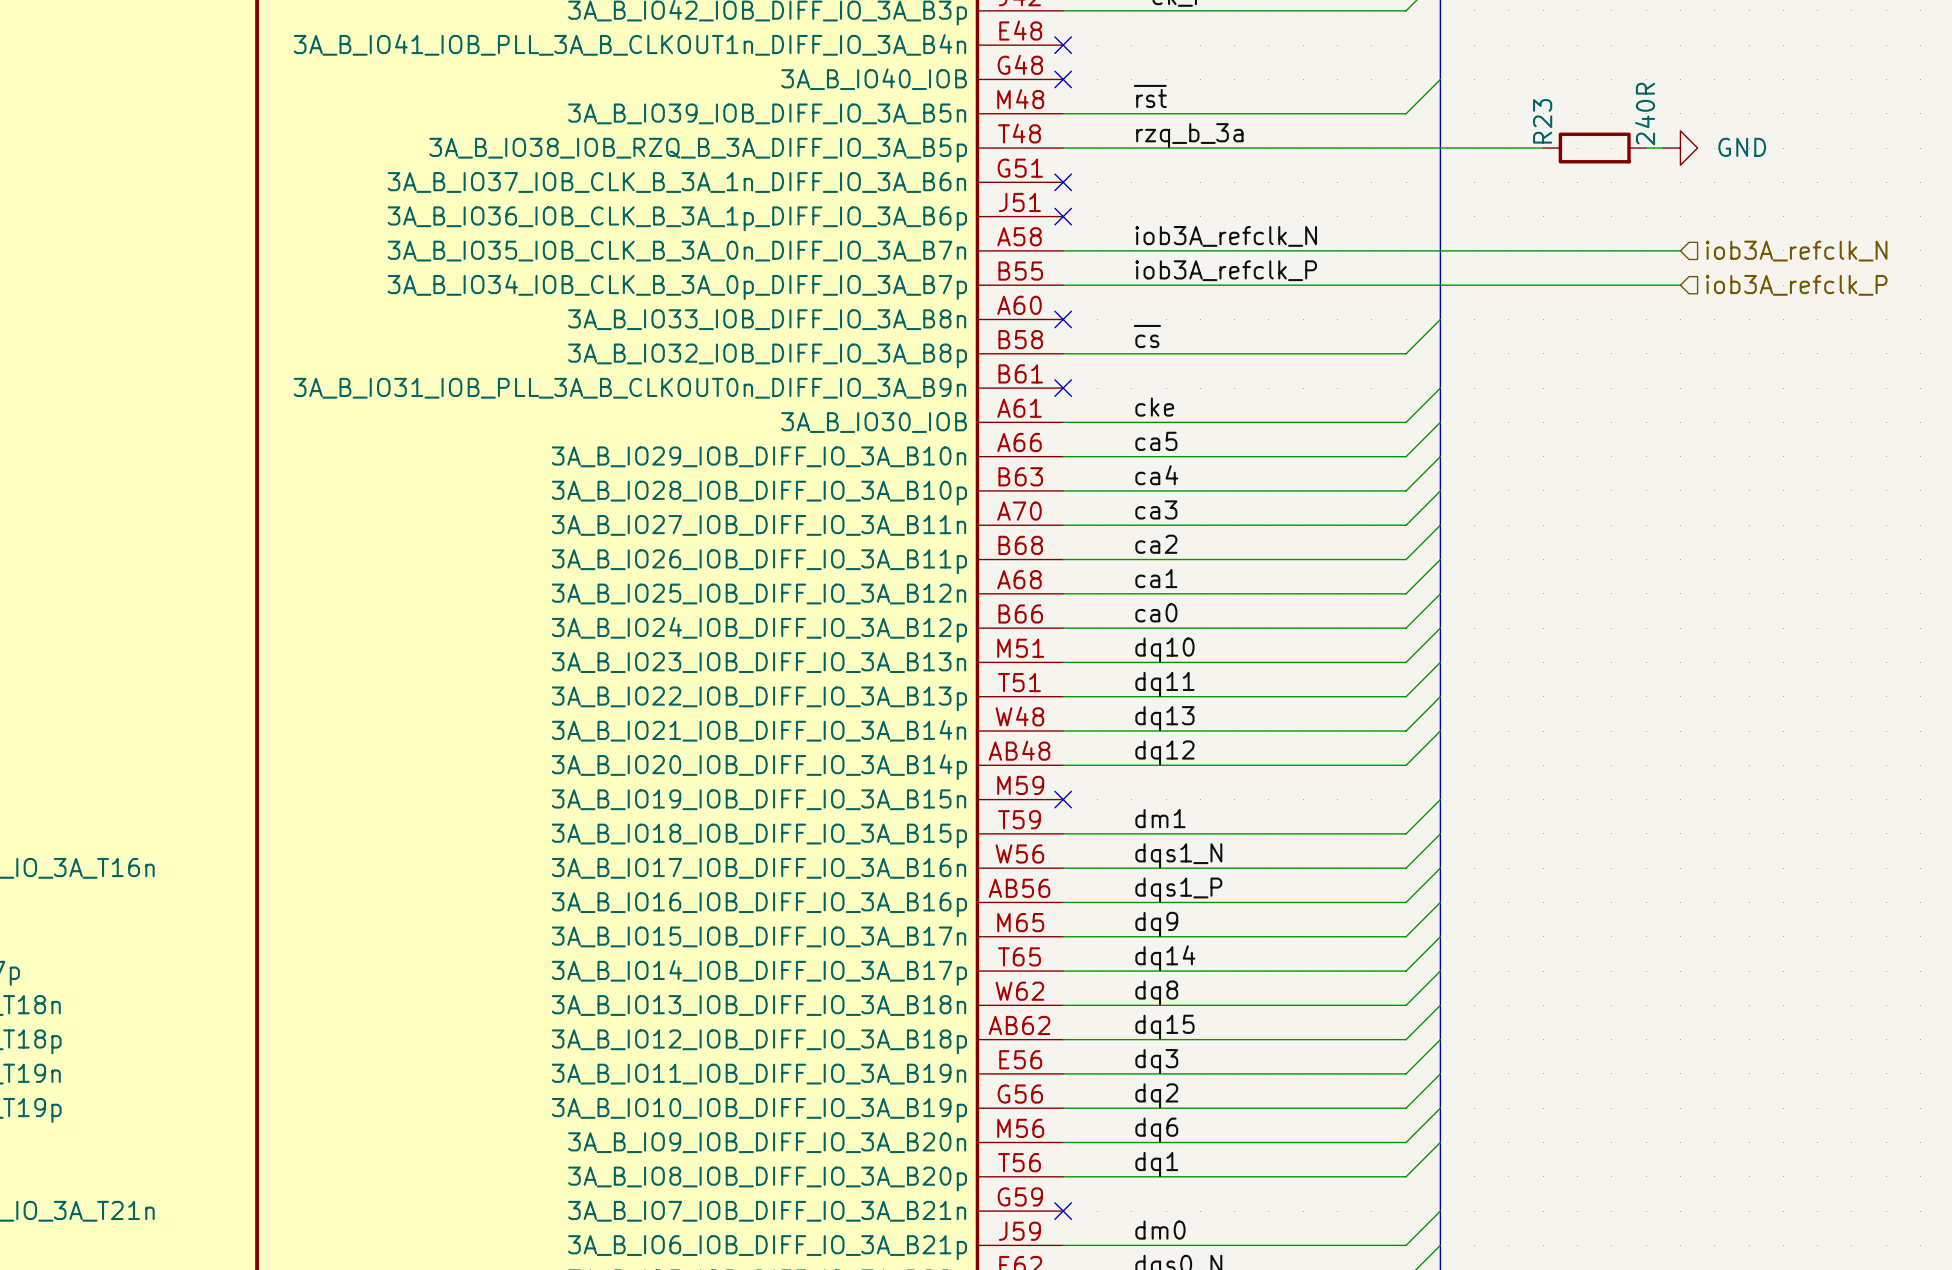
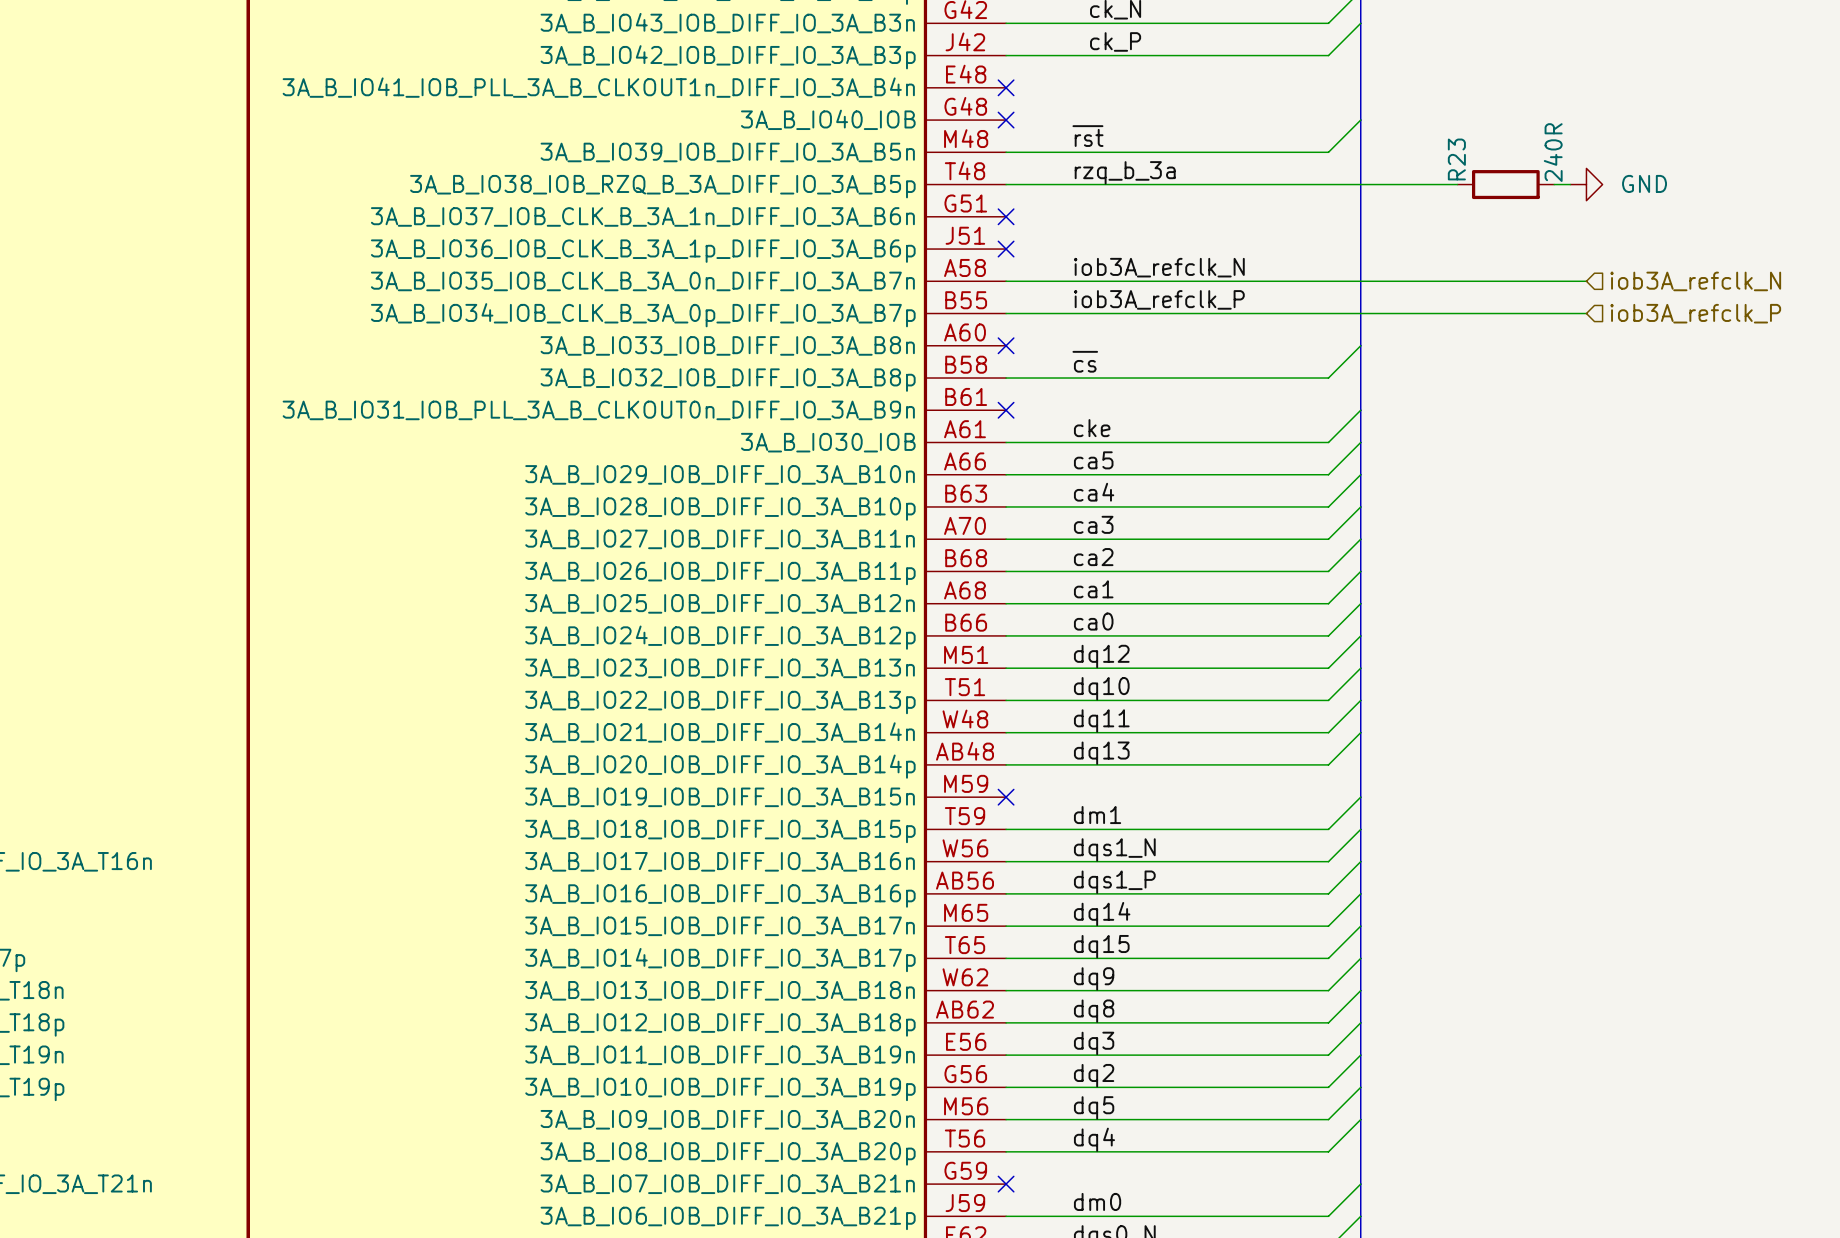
label: dq10 (1164, 649) -> dq12 (1101, 656)
label: dq11 (1164, 684) -> dq10 (1101, 688)
label: dq13 (1164, 718) -> dq11 (1101, 720)
label: dq12 (1164, 752) -> dq13 (1101, 753)
label: dq9 (1156, 924) -> dq14 (1102, 914)
label: dq14 (1165, 958) -> dq15 (1101, 946)
label: dq8 (1156, 992) -> dq9 (1094, 978)
label: dq15 (1164, 1027) -> dq8 (1094, 1011)
label: dq6 (1156, 1130) -> dq5 (1094, 1107)
label: dq1 (1156, 1164) -> dq4 (1094, 1139)

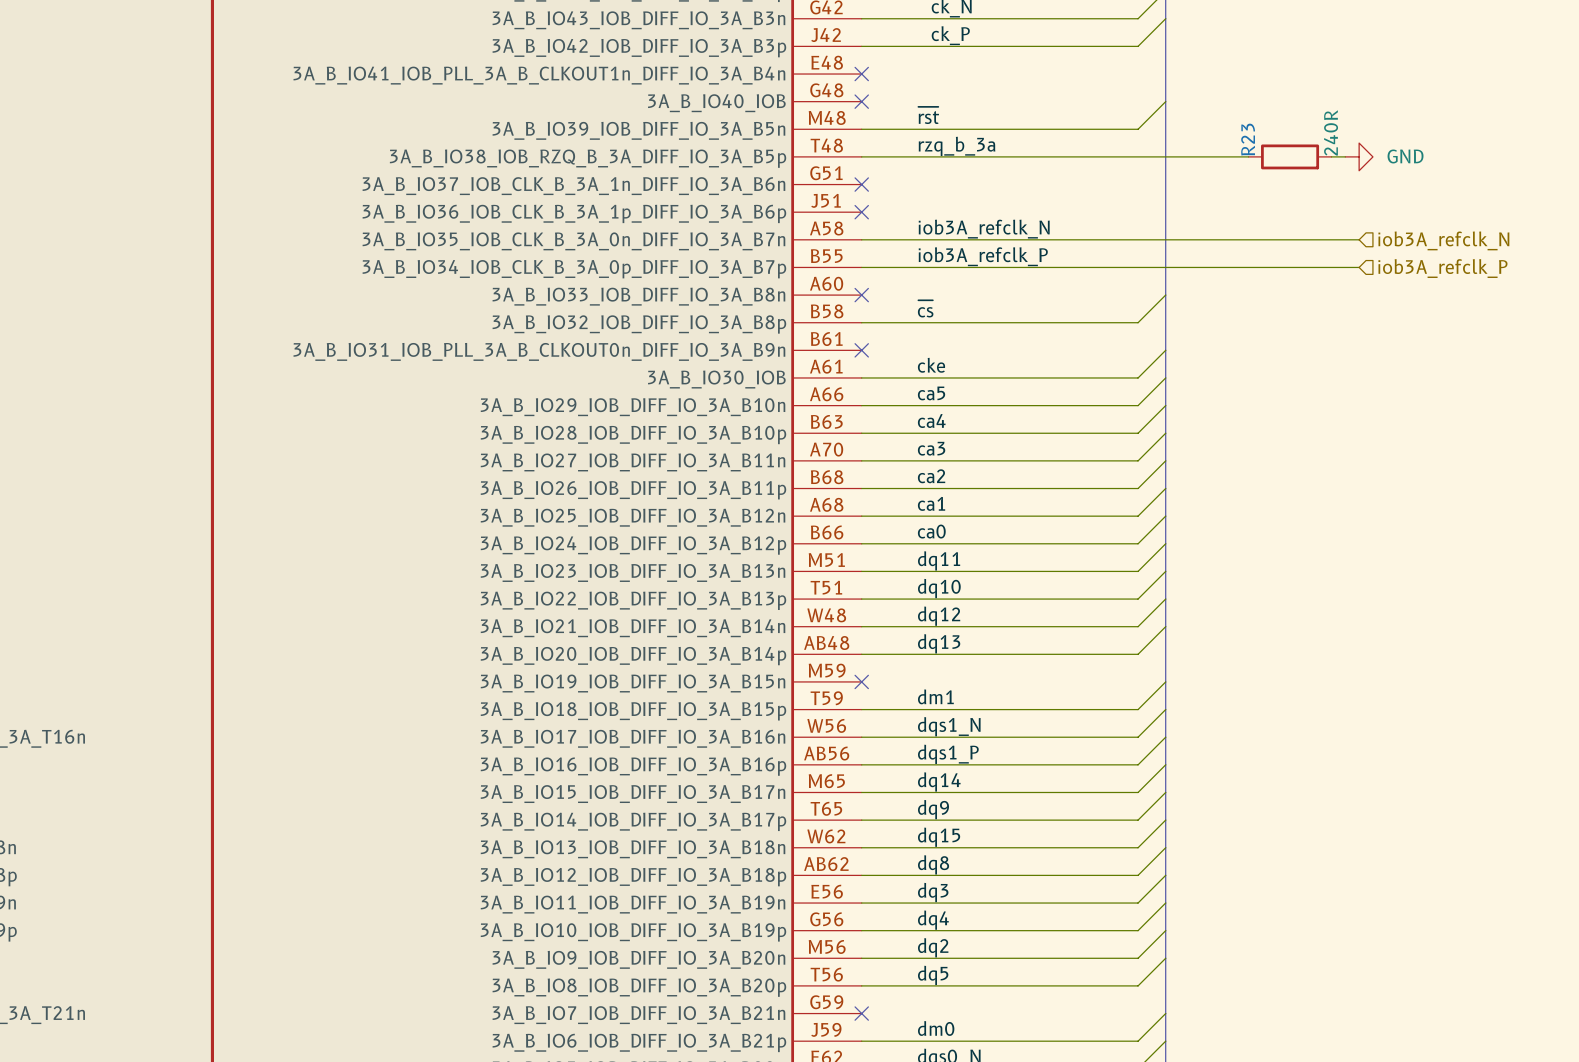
label: dq12 (1101, 656) -> dq11 (939, 560)
label: dq11 (1101, 720) -> dq12 (939, 616)
label: dq15 (1101, 946) -> dq9 (933, 809)
label: dq9 (1094, 978) -> dq15 (939, 837)
label: dq2 (1094, 1075) -> dq4 (933, 920)
label: dq5 (1094, 1107) -> dq2 (933, 947)
label: dq4 (1094, 1139) -> dq5 (933, 975)

